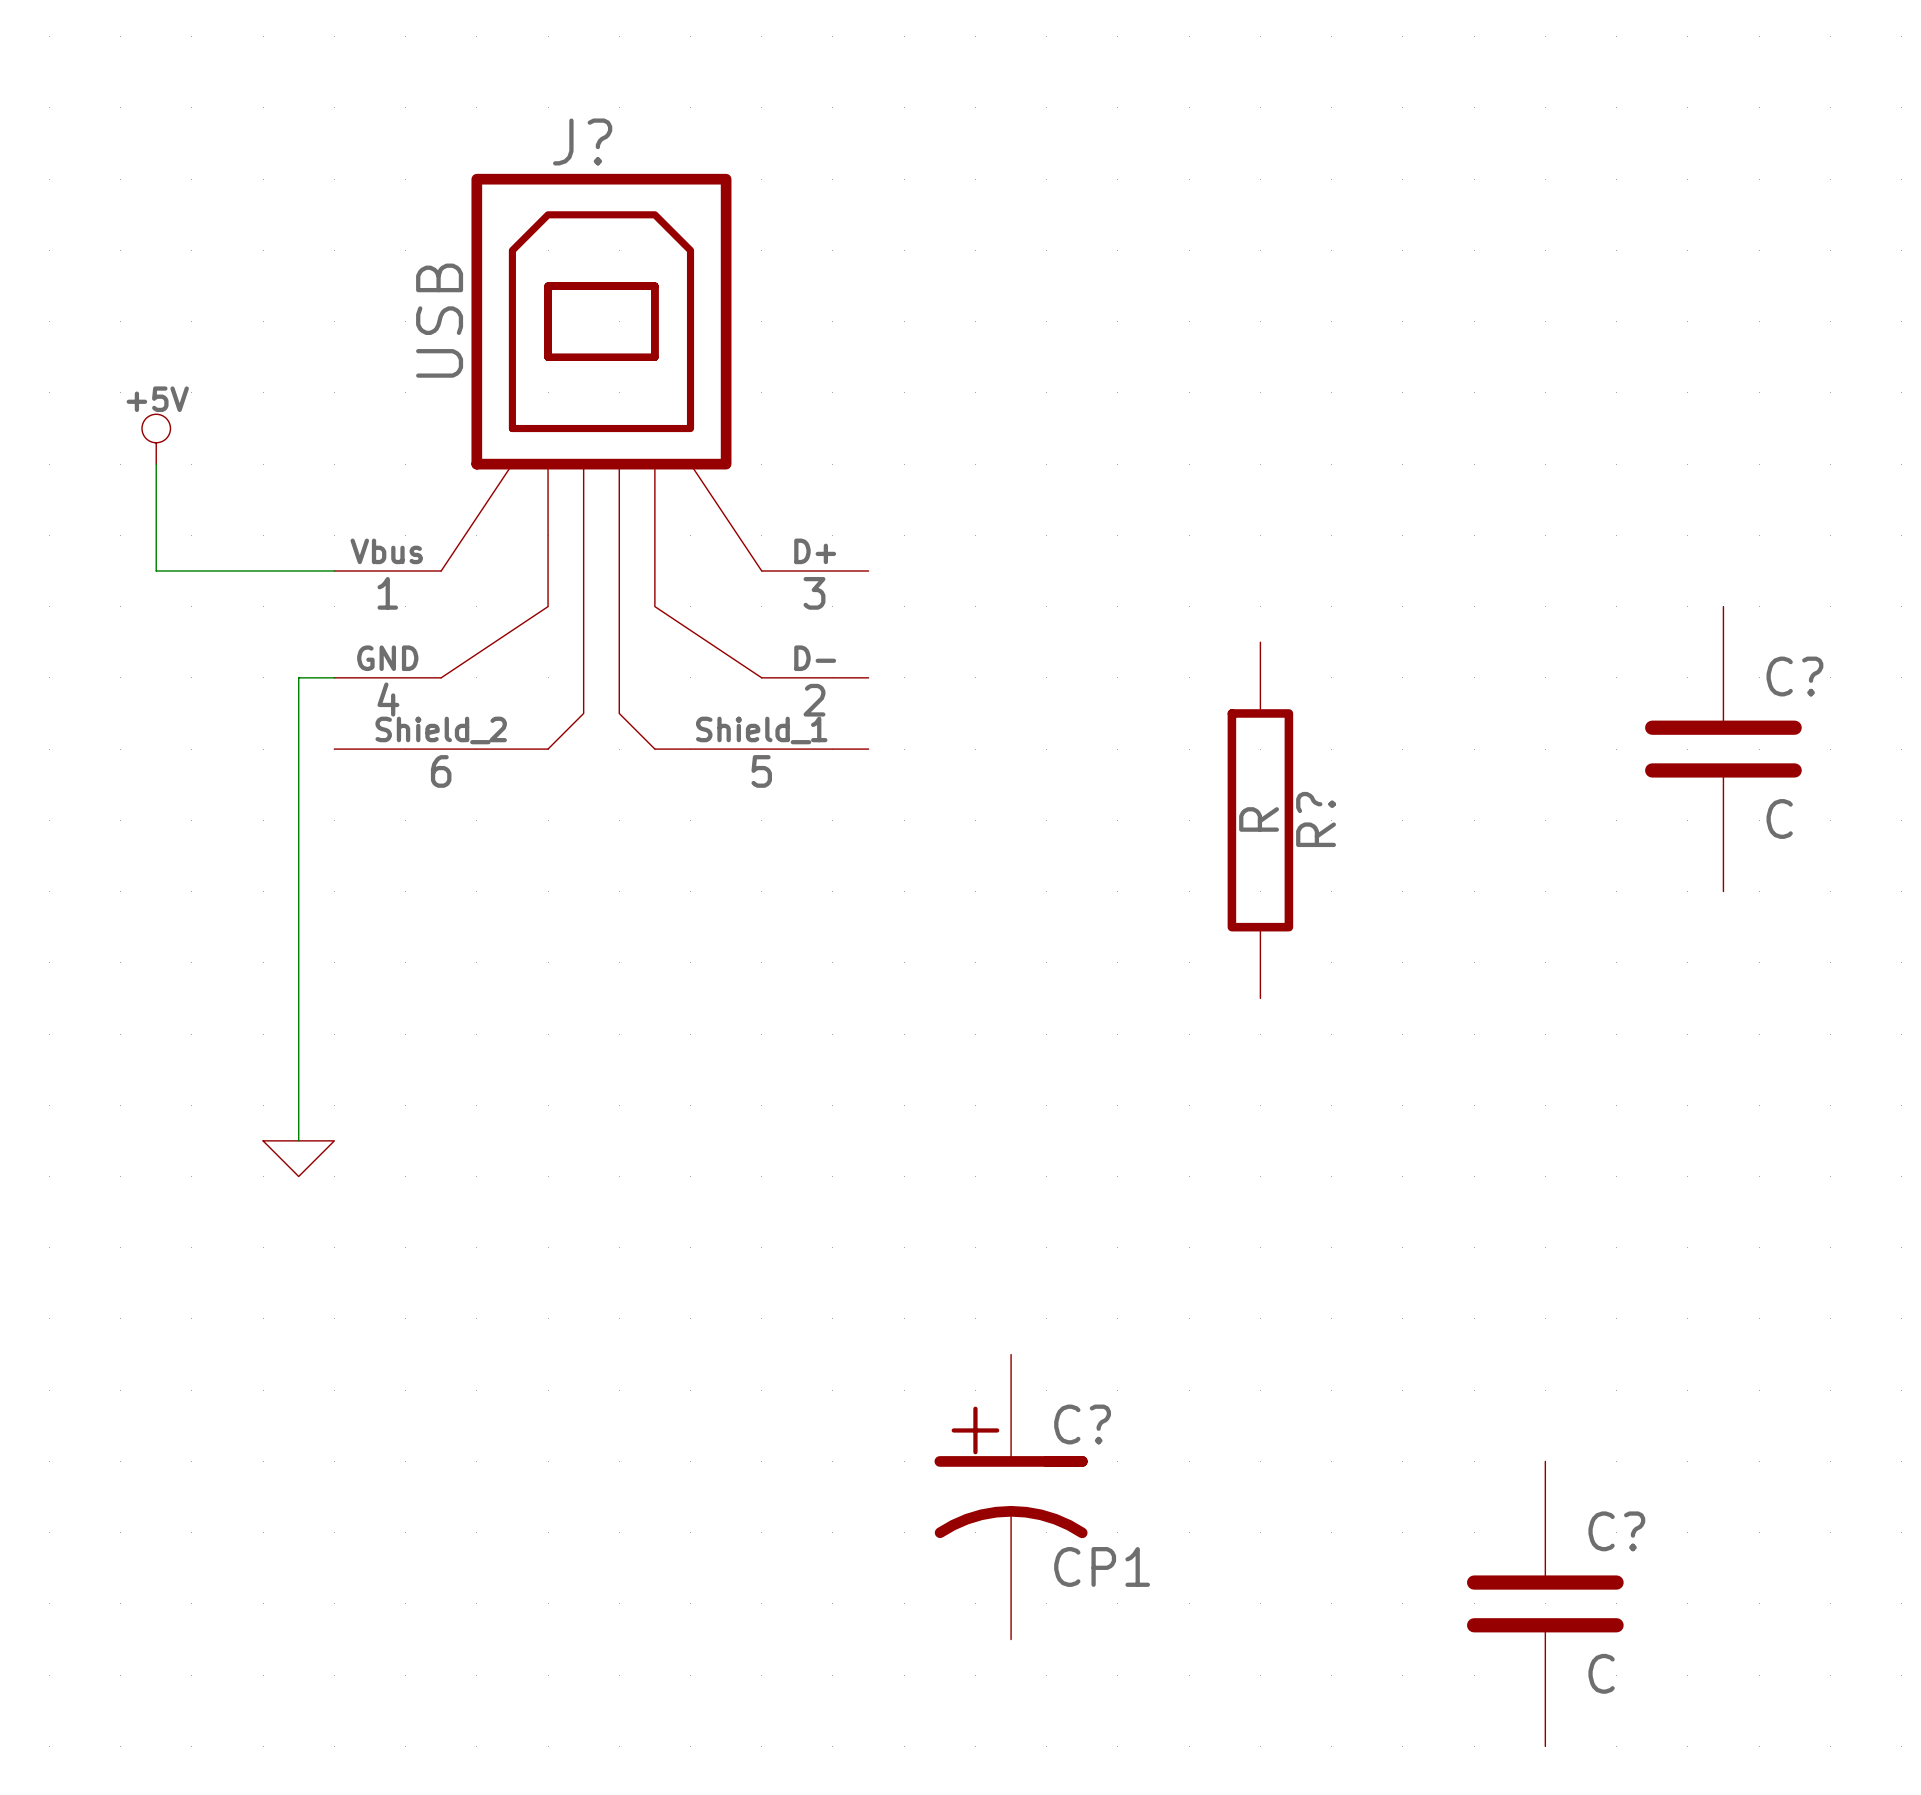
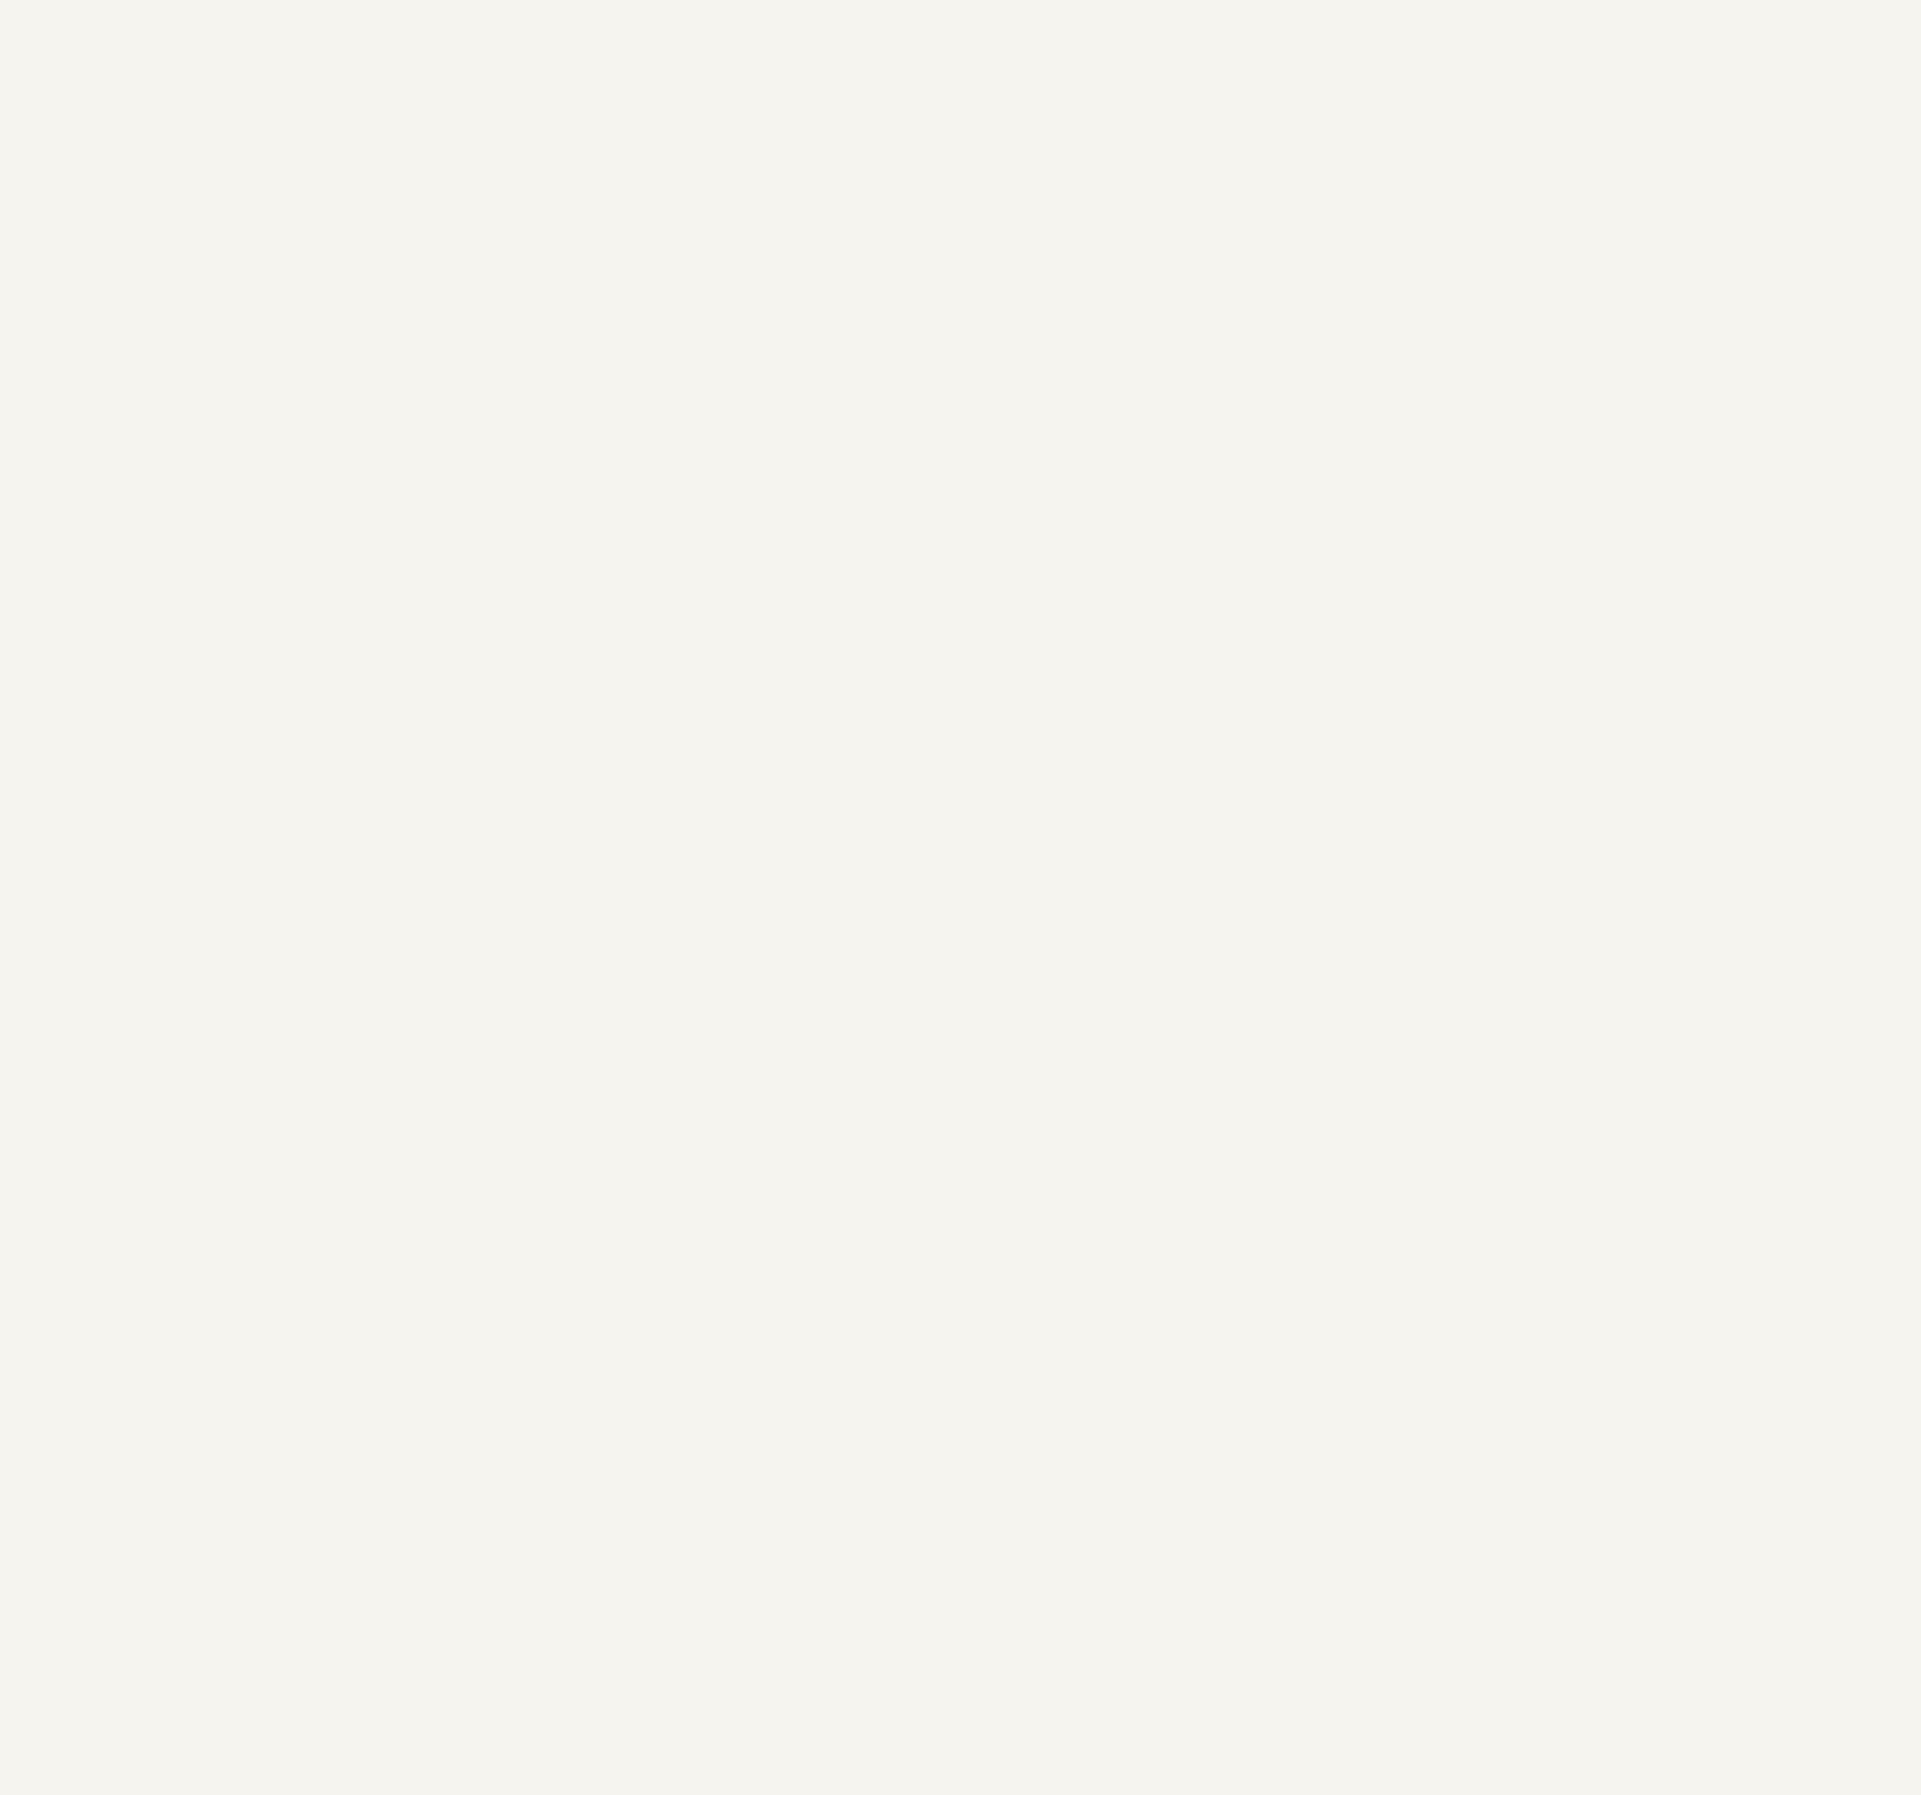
power symbol: +5V (156, 439) -> none
J?: USB (601, 461) -> none
wire: (156, 464) (156, 570) (334, 570) -> none
wire: (334, 677) (298, 677) (298, 1140) -> none
C?: C (1723, 749) -> none
R?: R (1260, 820) -> none
power symbol: (298, 1158) -> none
C?: CP1 (1011, 1497) -> none
C?: C (1545, 1603) -> none

